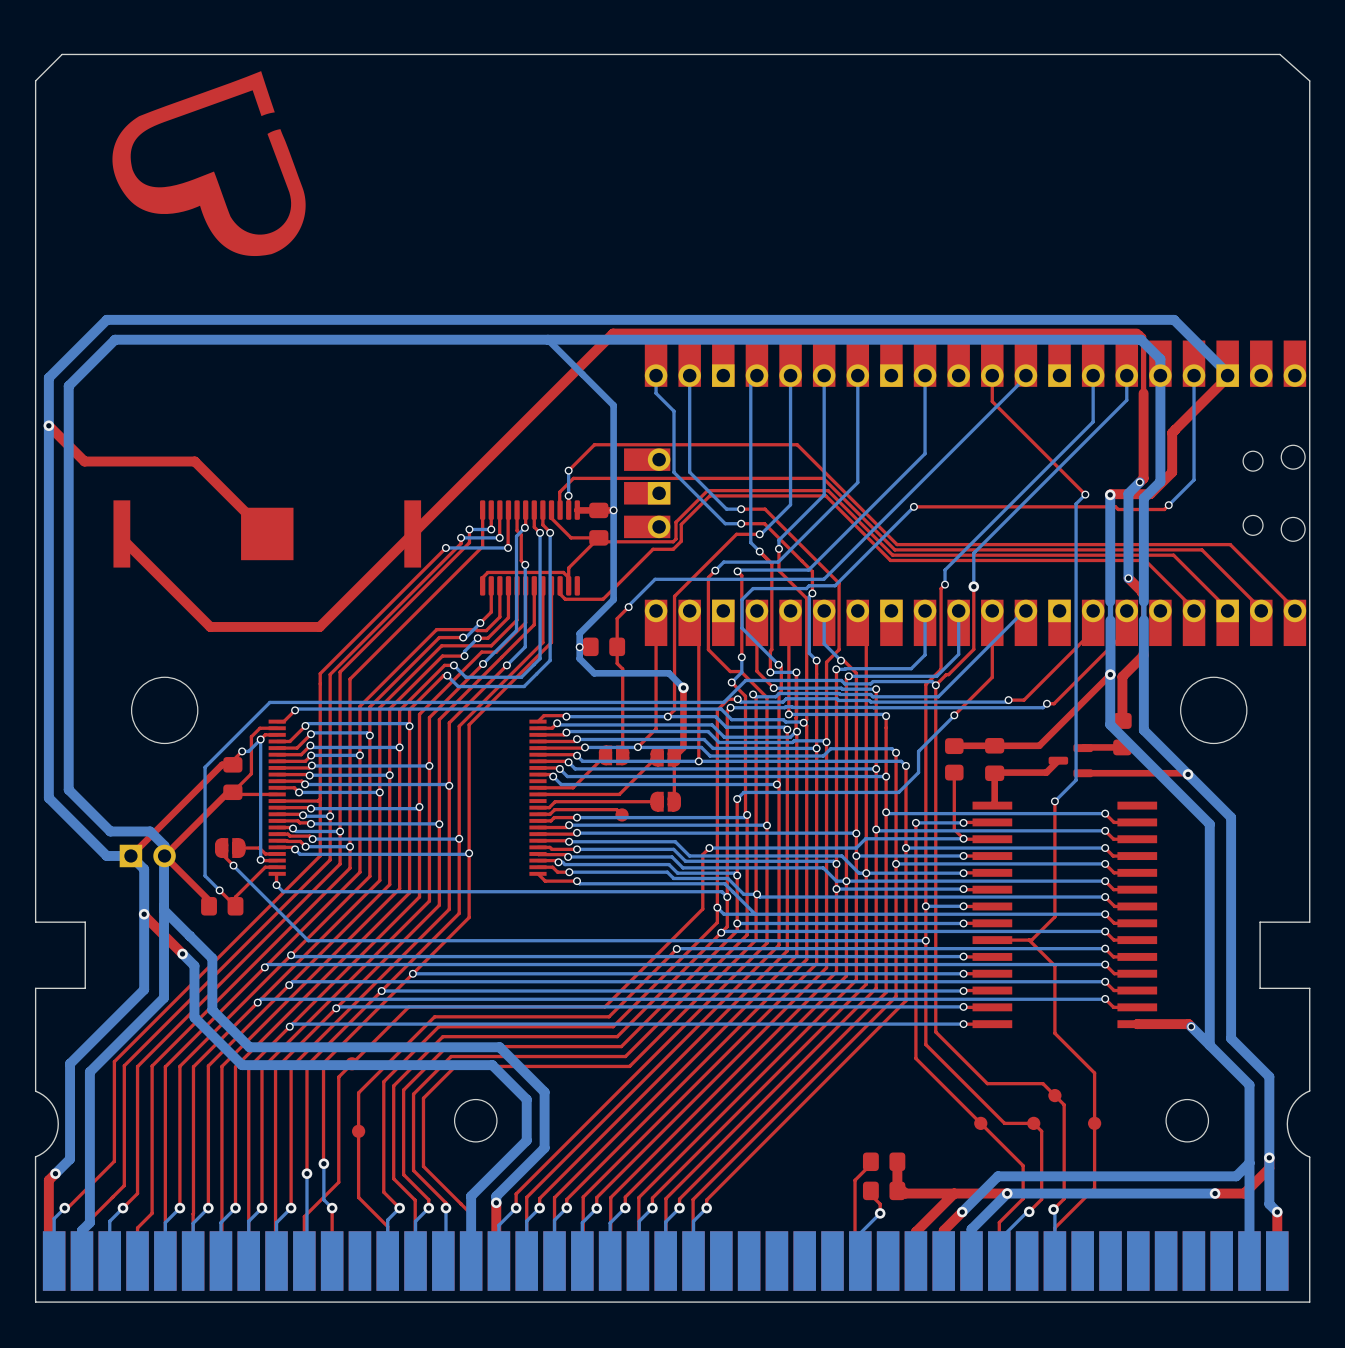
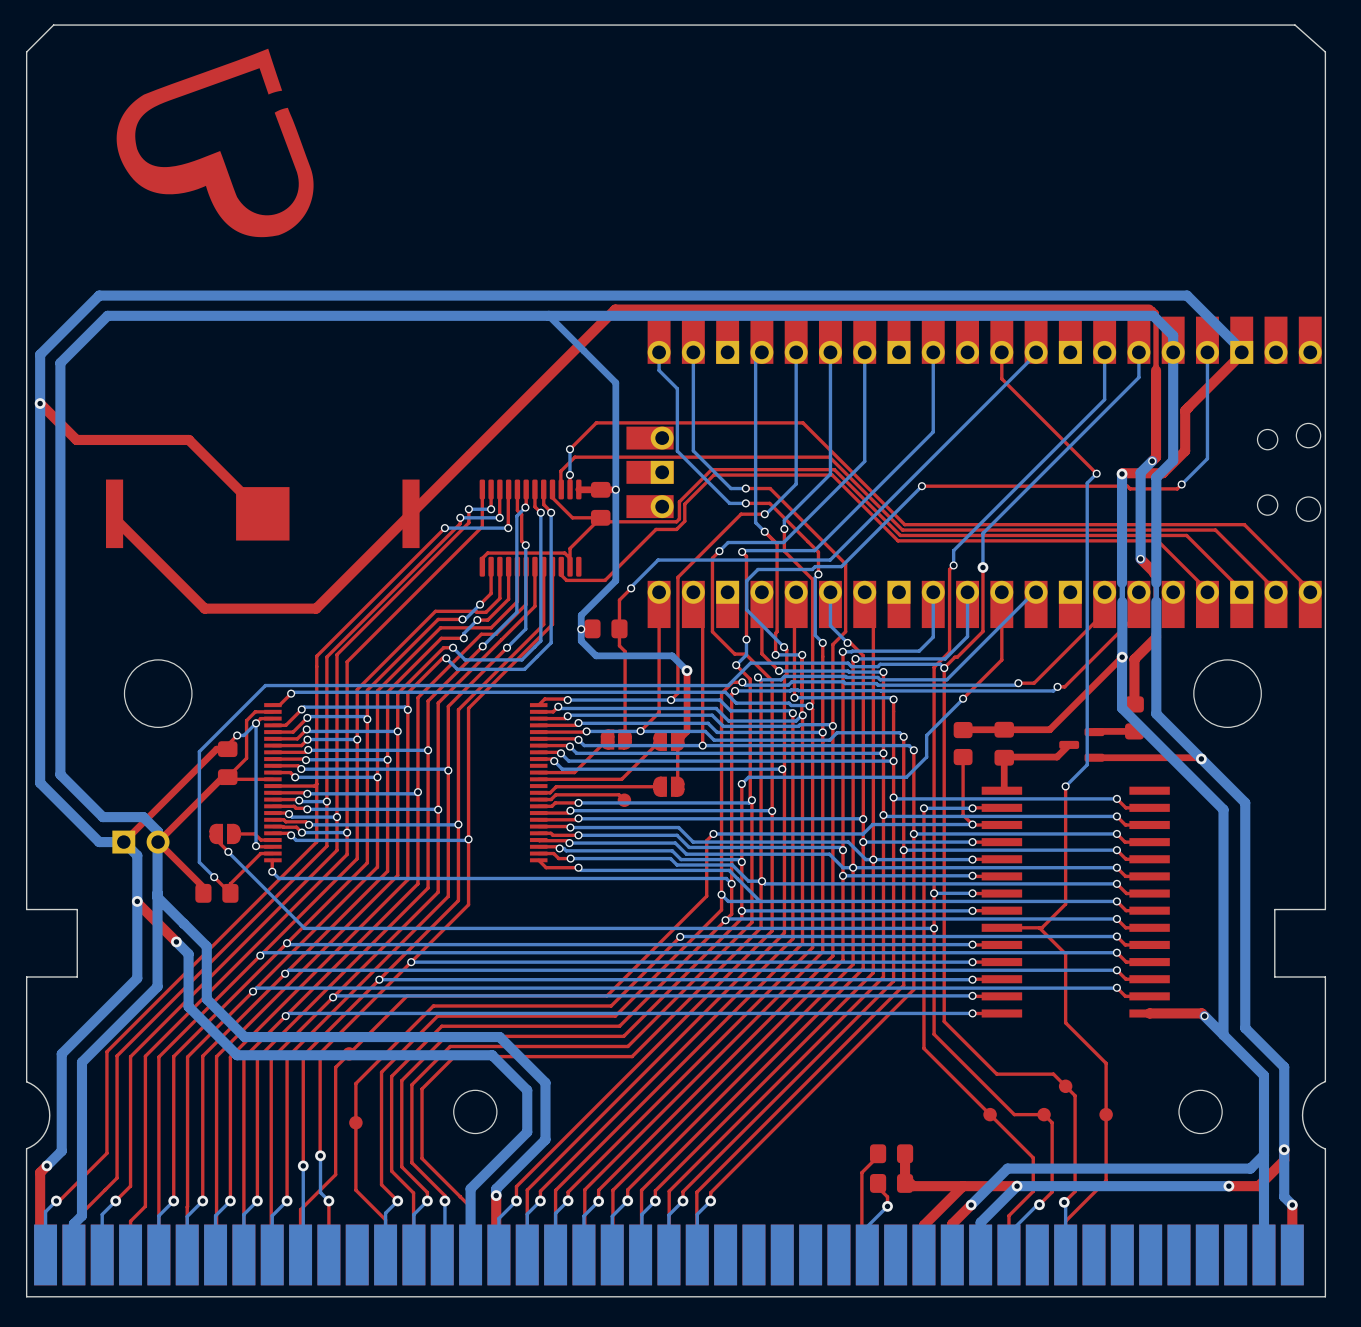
drawing shape: [112, 71, 306, 257] -> [116, 48, 314, 238]

